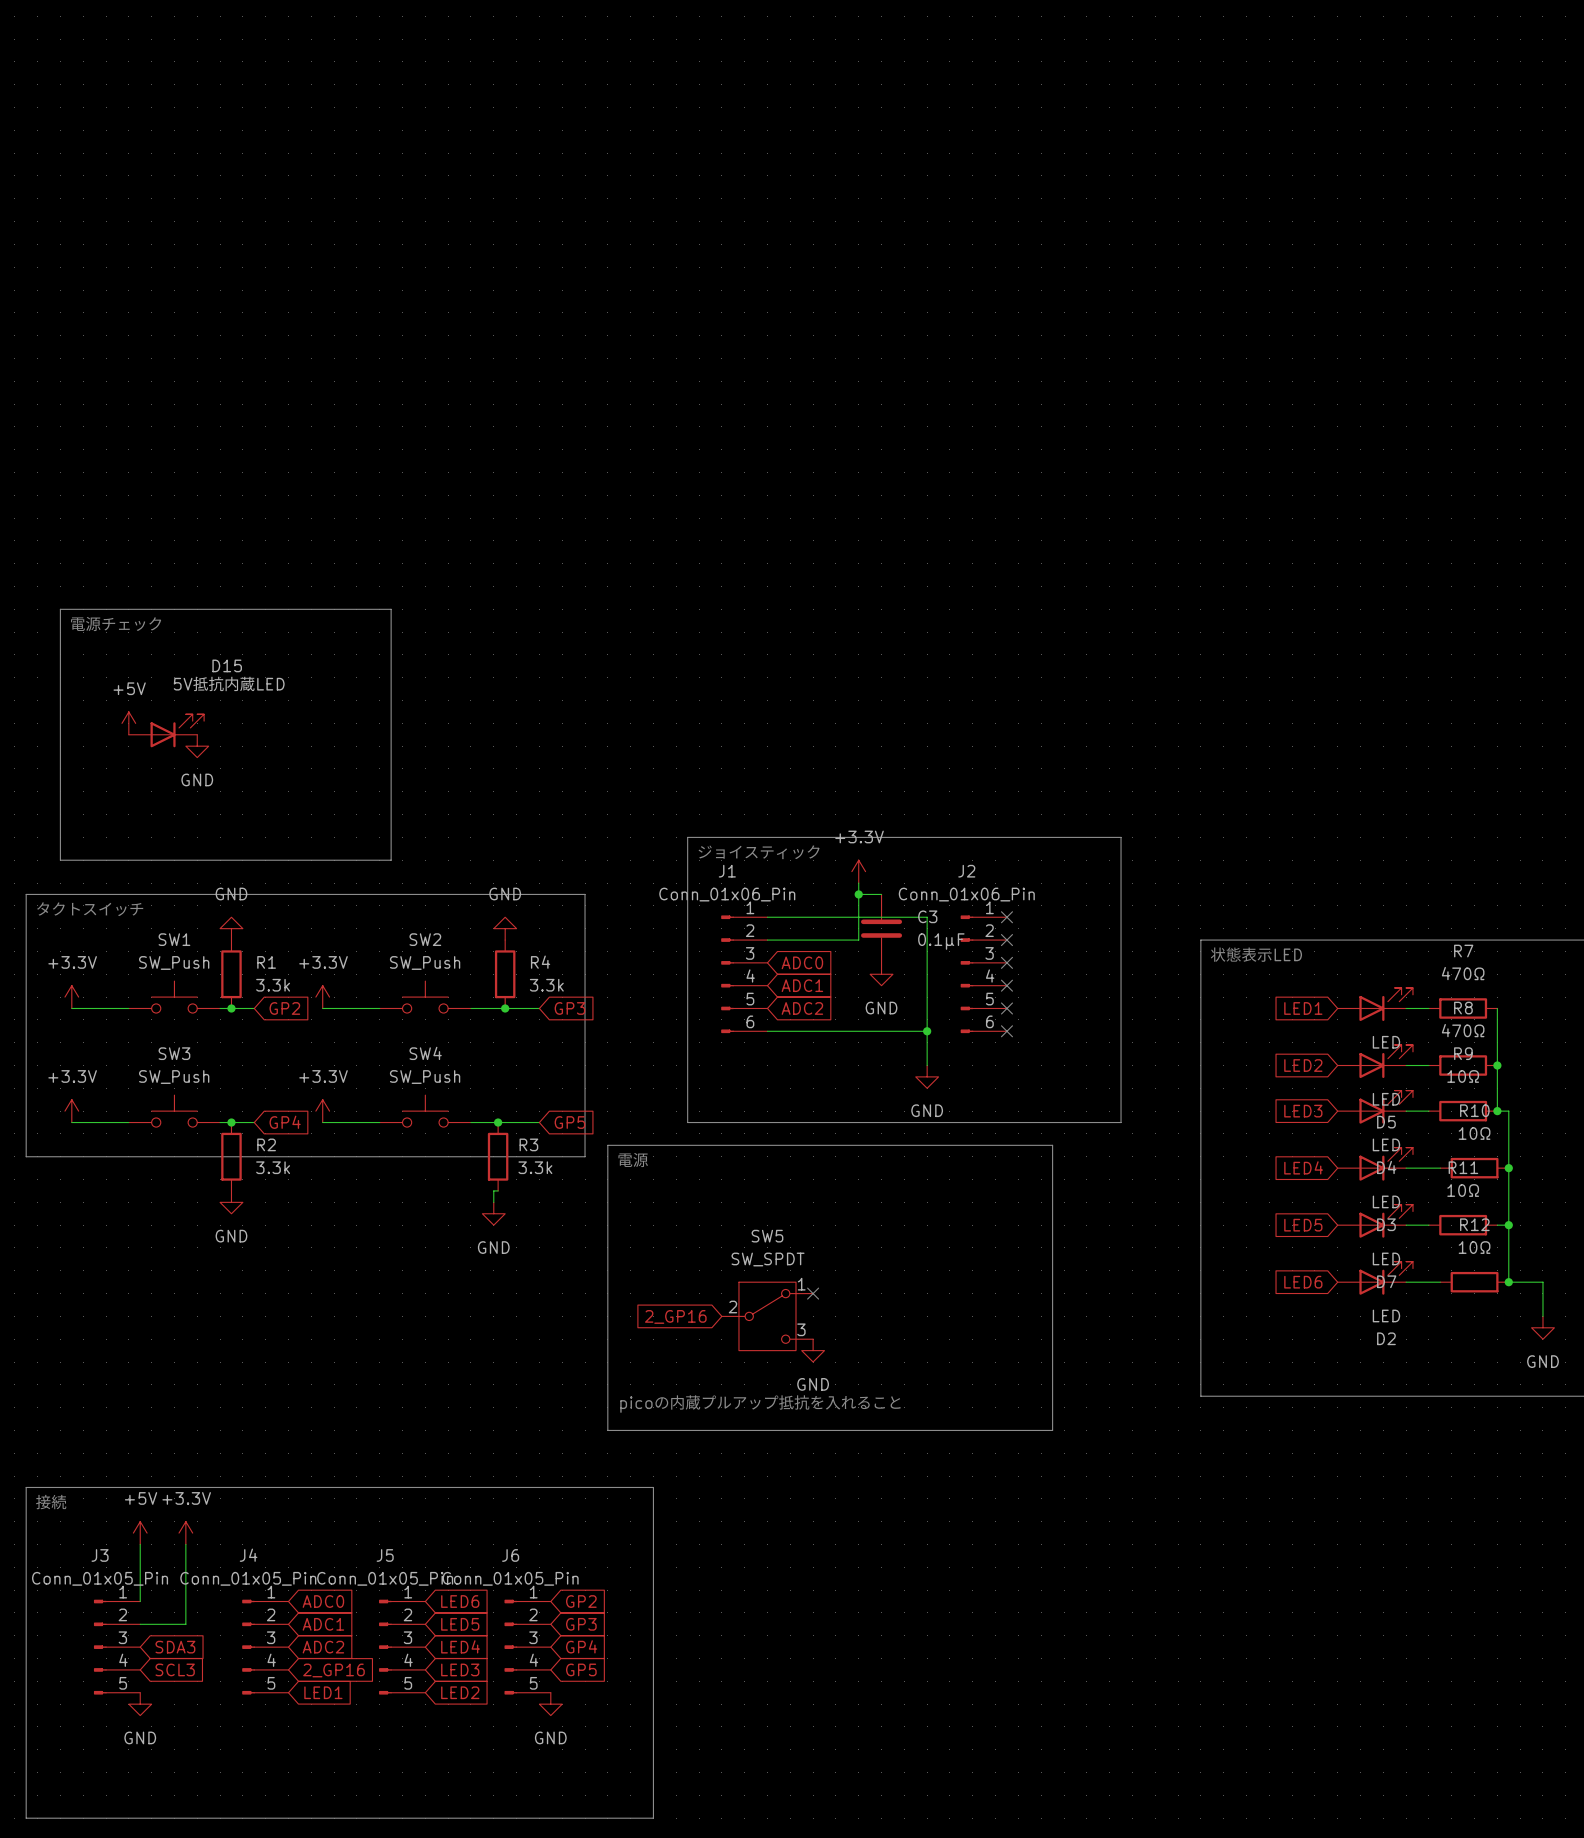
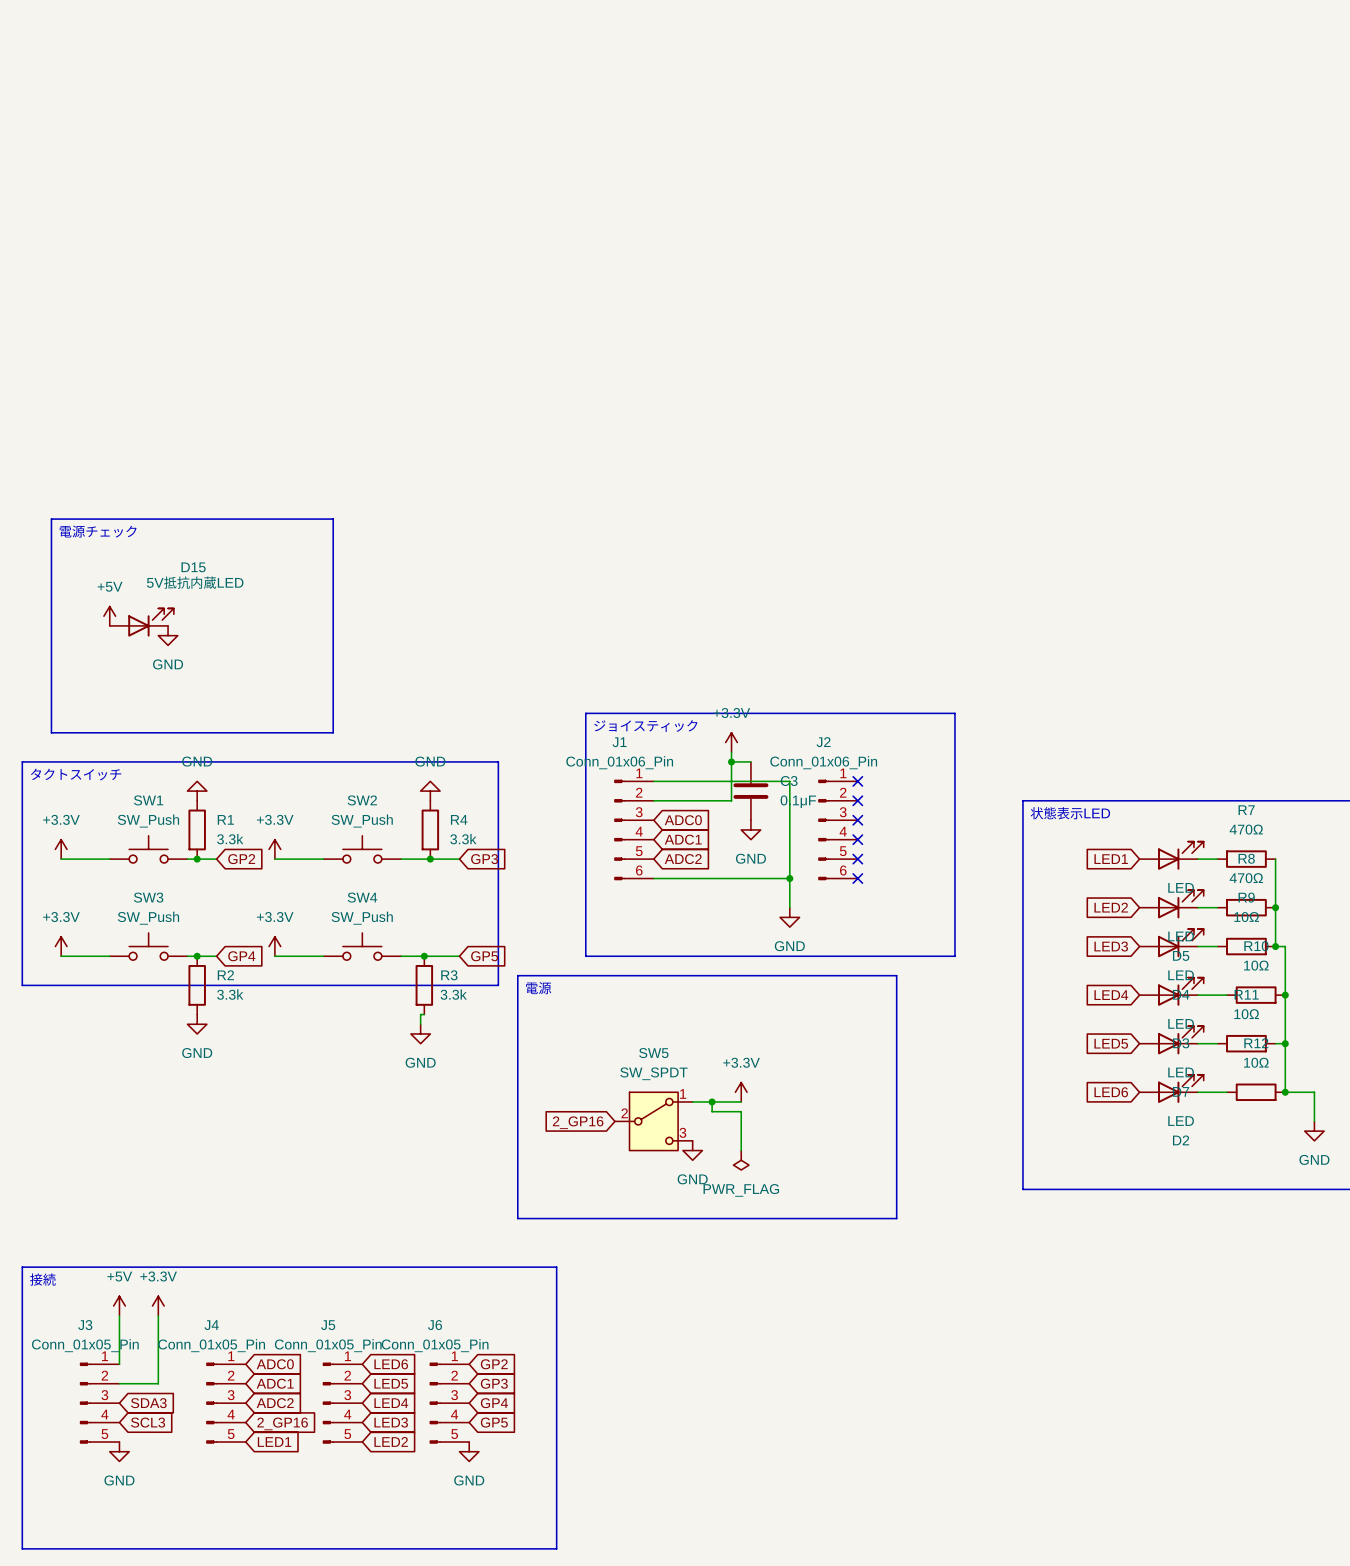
power symbol: none -> +3.3V (741, 1092)
wire: none -> (692, 1101) (741, 1101)
no-connect mark: (813, 1293) -> none
wire: none -> (712, 1101) (712, 1111) (741, 1111) (741, 1150)
junction: none -> (712, 1101)
power symbol: none -> PWR_FLAG (741, 1160)
text: picoの内蔵プルアップ抵抗を入れること (760, 1403) -> none

